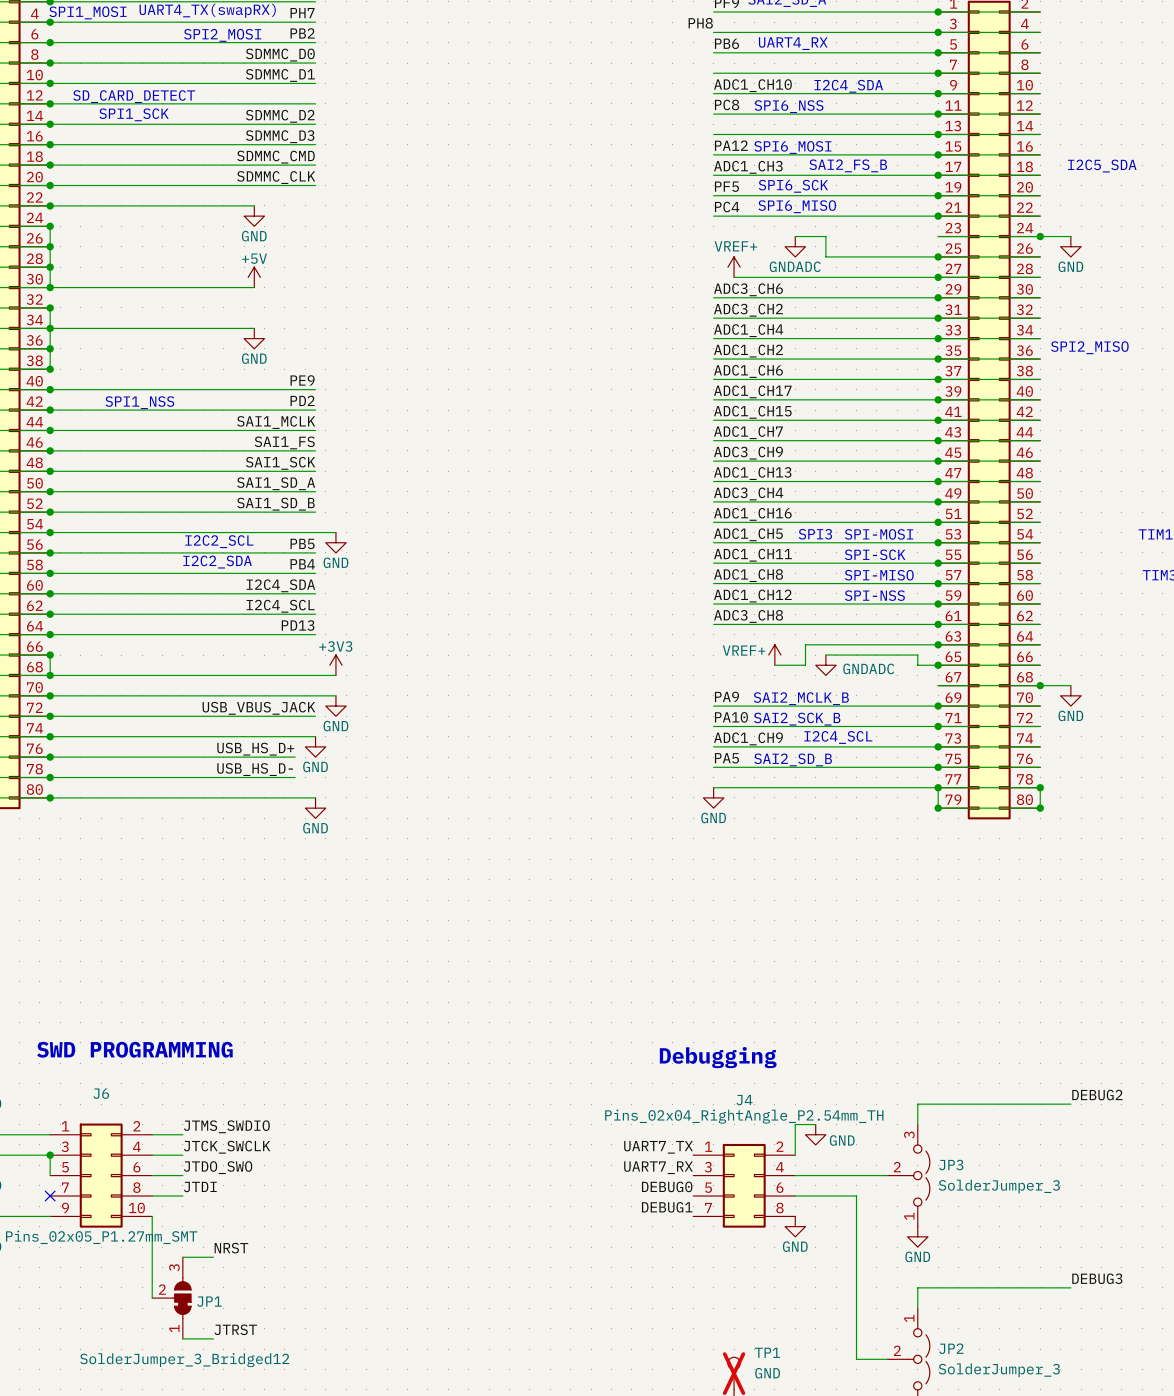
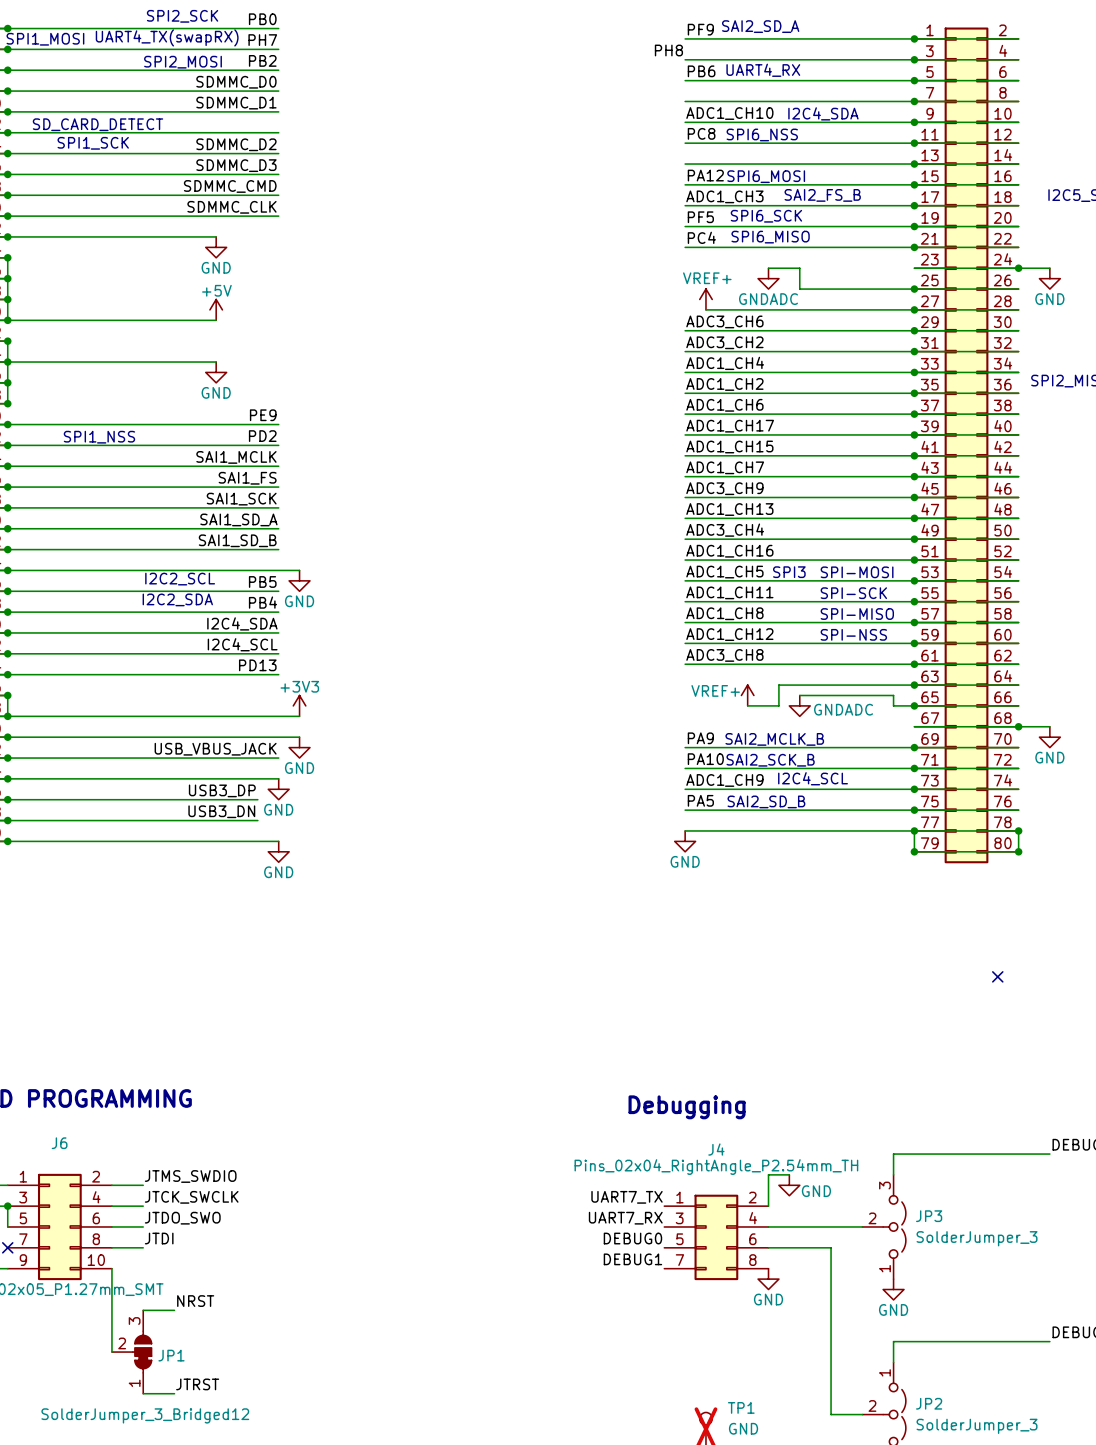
label: USB_HS_D+ (255, 749) -> USB3_DP (222, 790)
label: USB_HS_D- (255, 769) -> USB3_DN (221, 811)
no-connect mark: none -> (997, 976)

